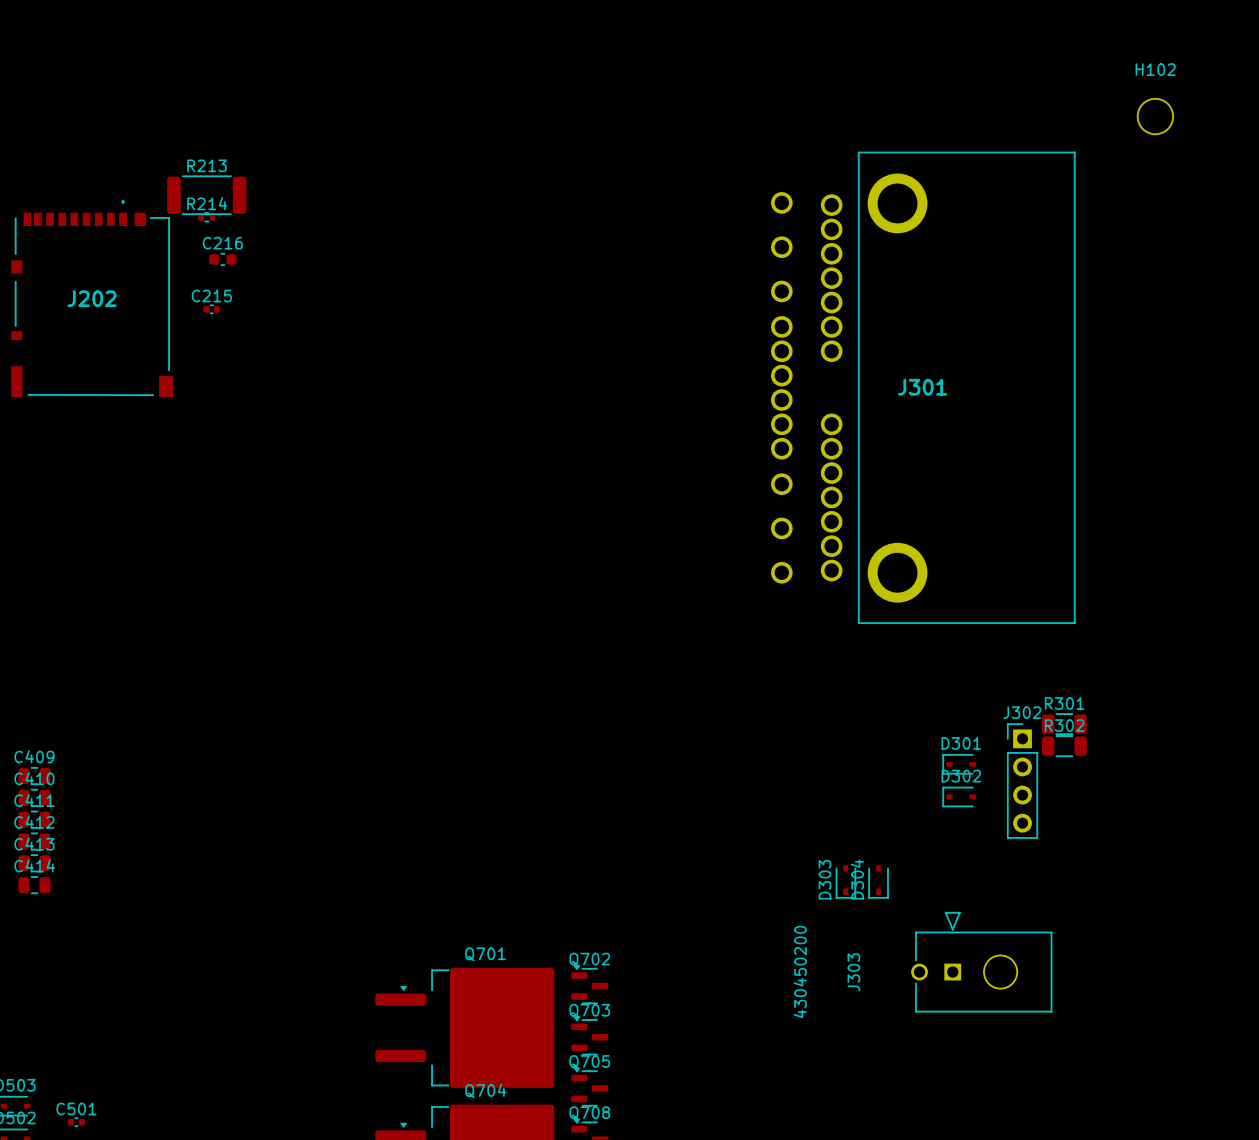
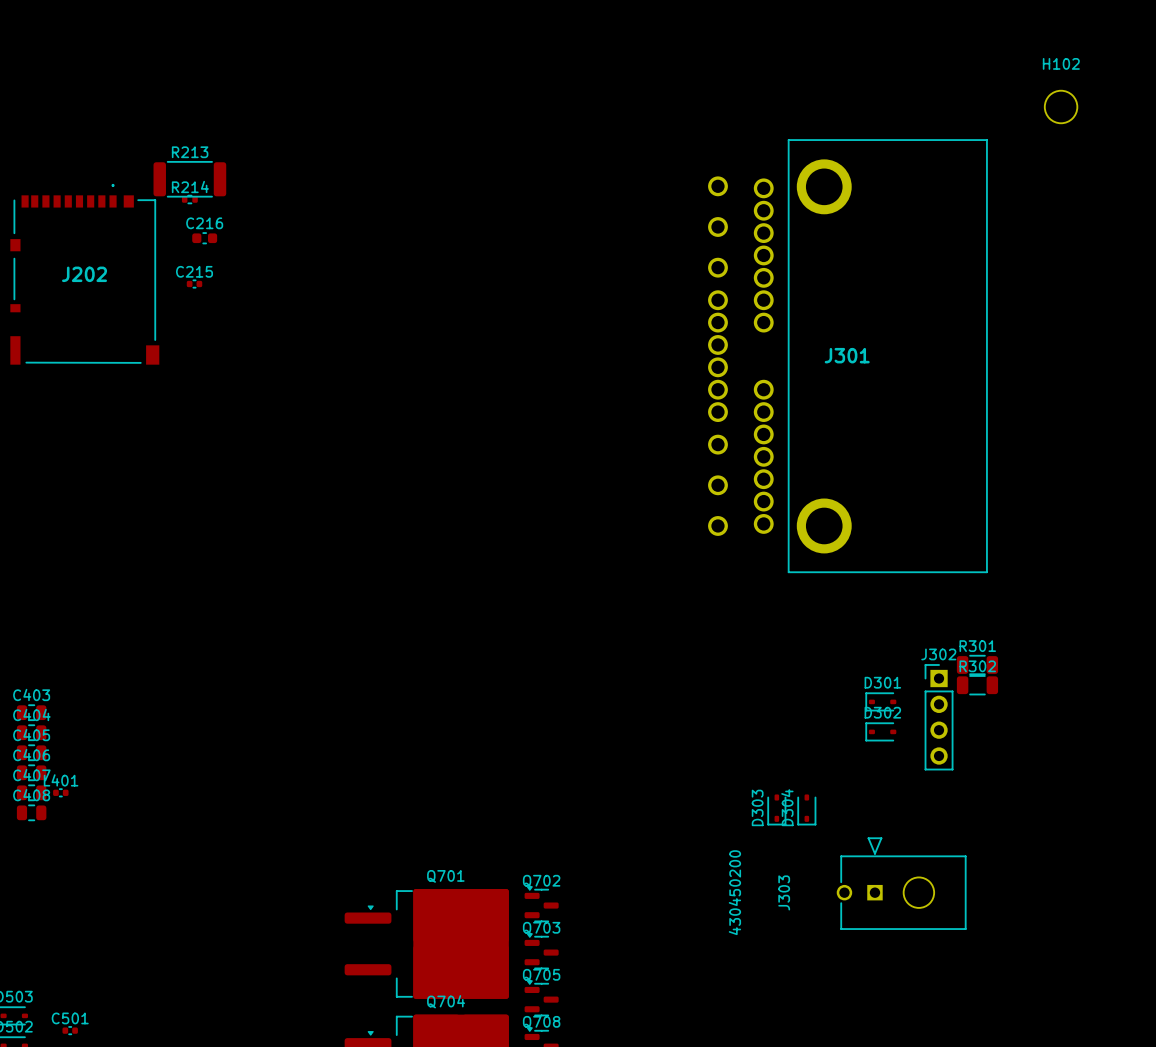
C409 name: C409 (34, 756) -> C403 (31, 694)
C410 name: C410 (34, 778) -> C404 (31, 715)
C411 name: C411 (34, 800) -> C405 (31, 735)
C412 name: C412 (34, 822) -> C406 (31, 755)
C413 name: C413 (34, 844) -> C407 (31, 775)
L401: none -> (60, 792)
C414 name: C414 (34, 865) -> C408 (31, 795)

